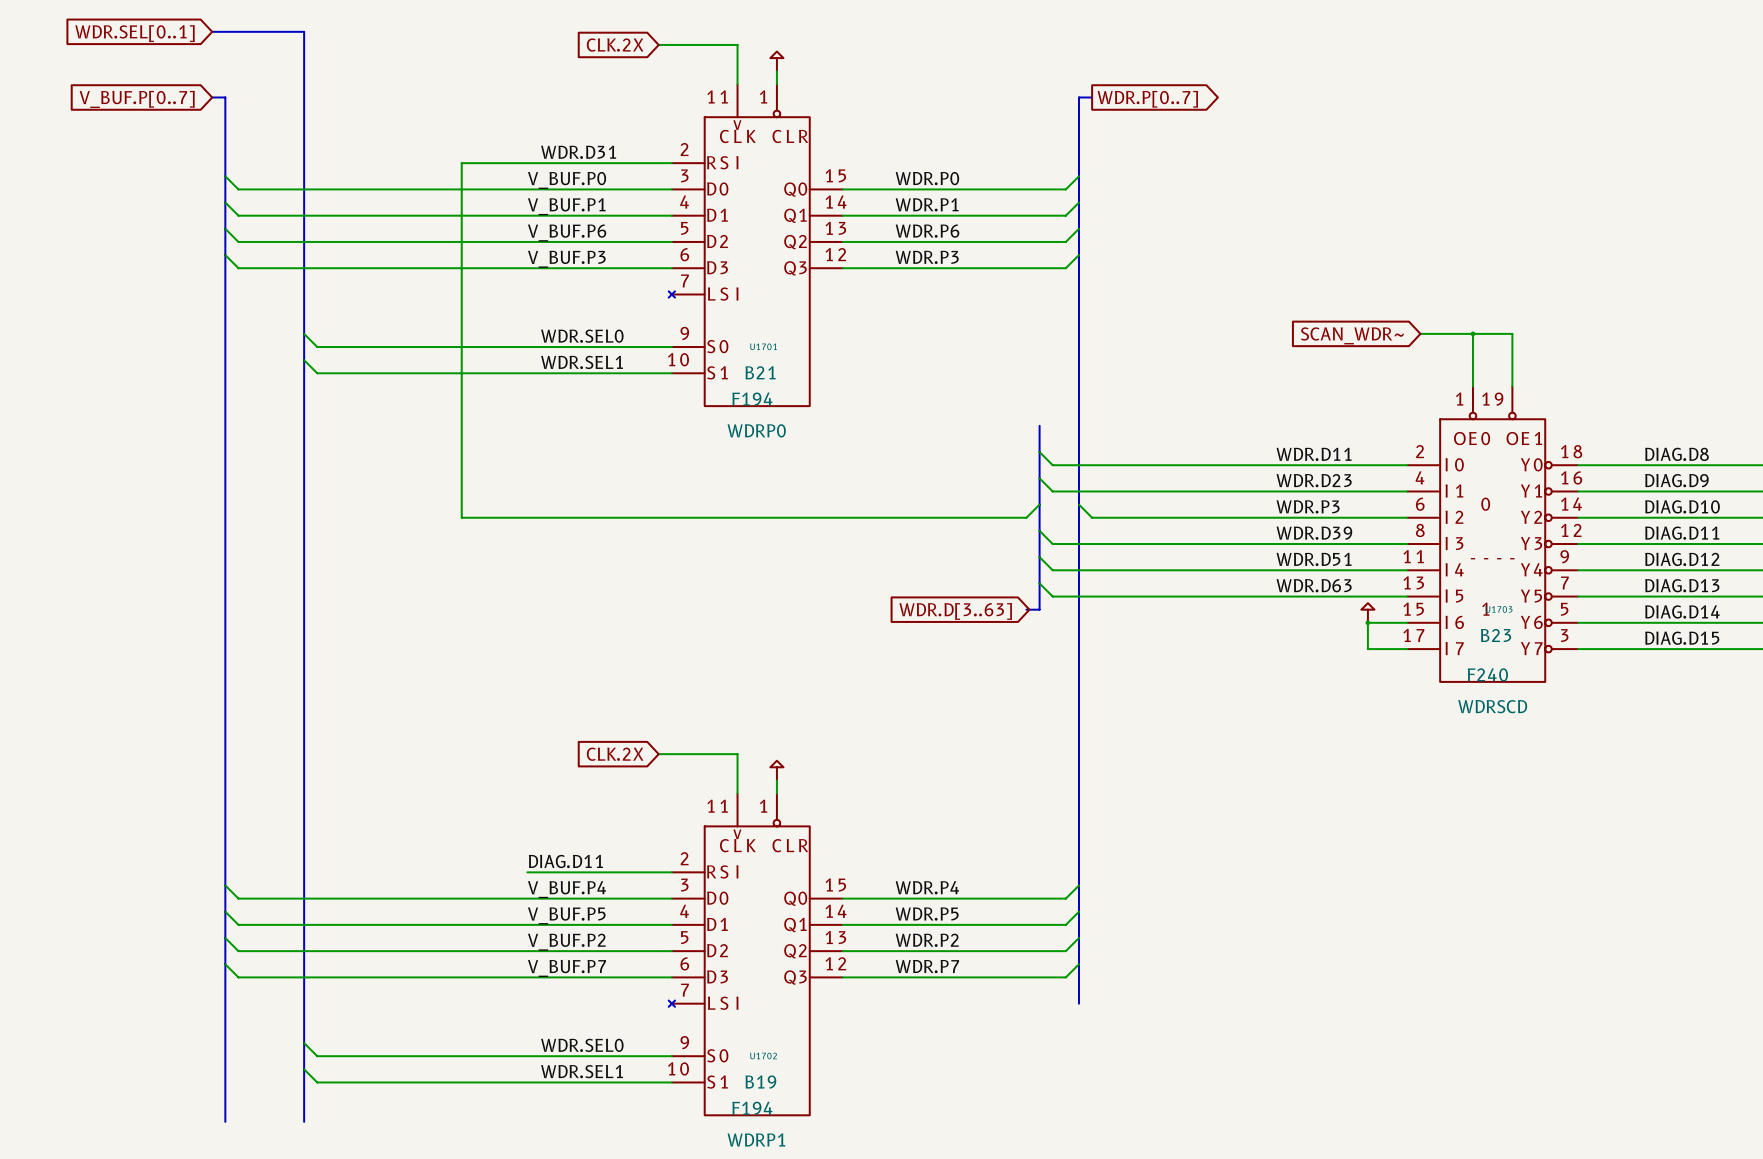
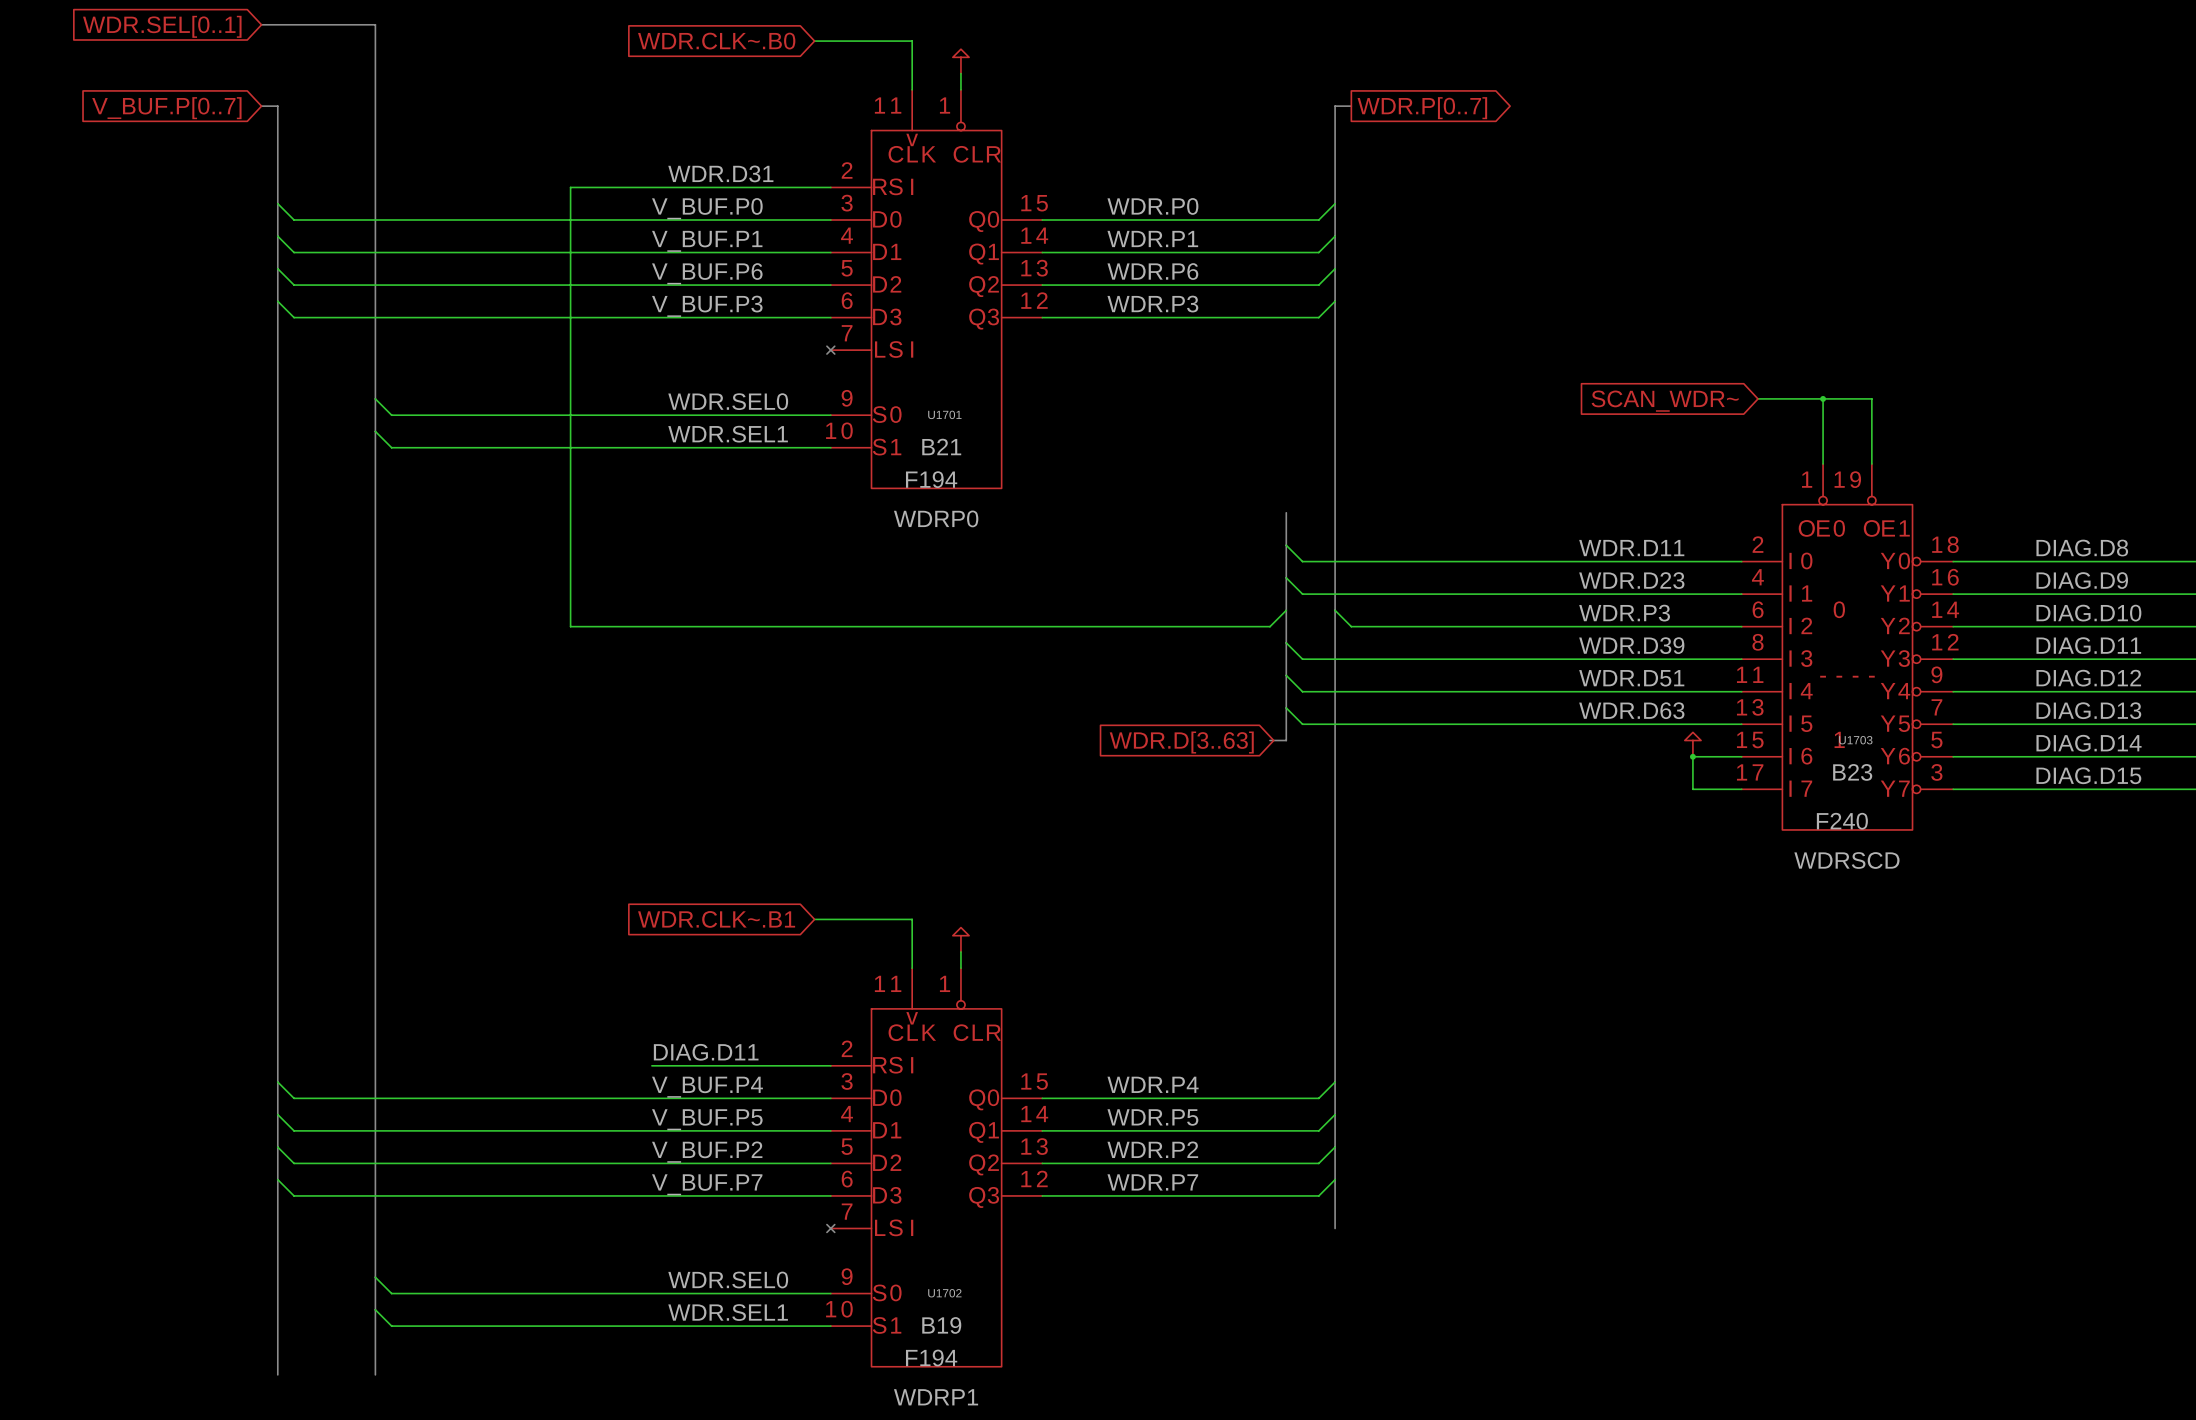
global label: CLK.2X (615, 45) -> WDR.CLK~.B0 (716, 41)
global label: CLK.2X (615, 754) -> WDR.CLK~.B1 (716, 919)

